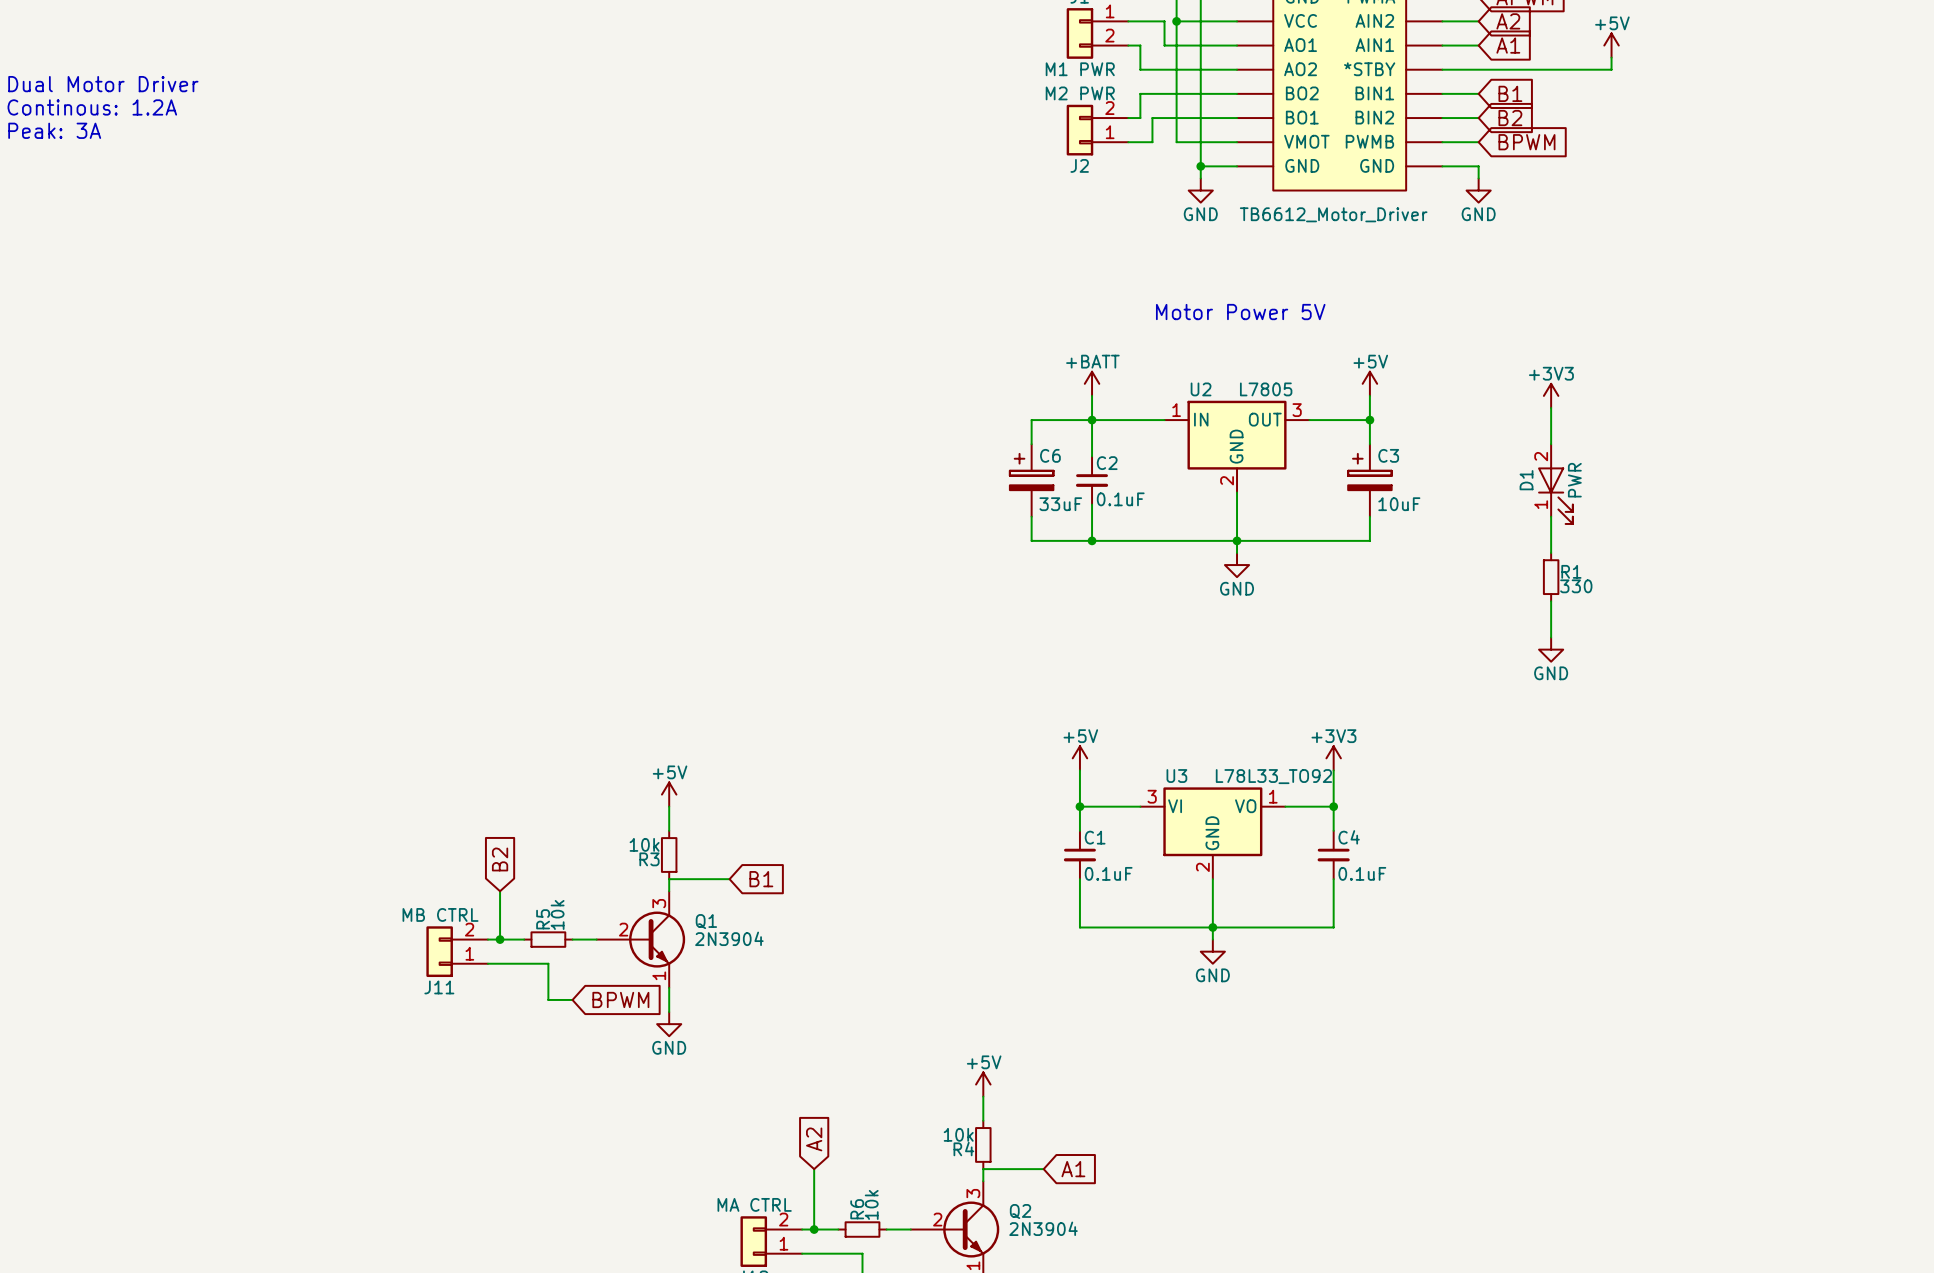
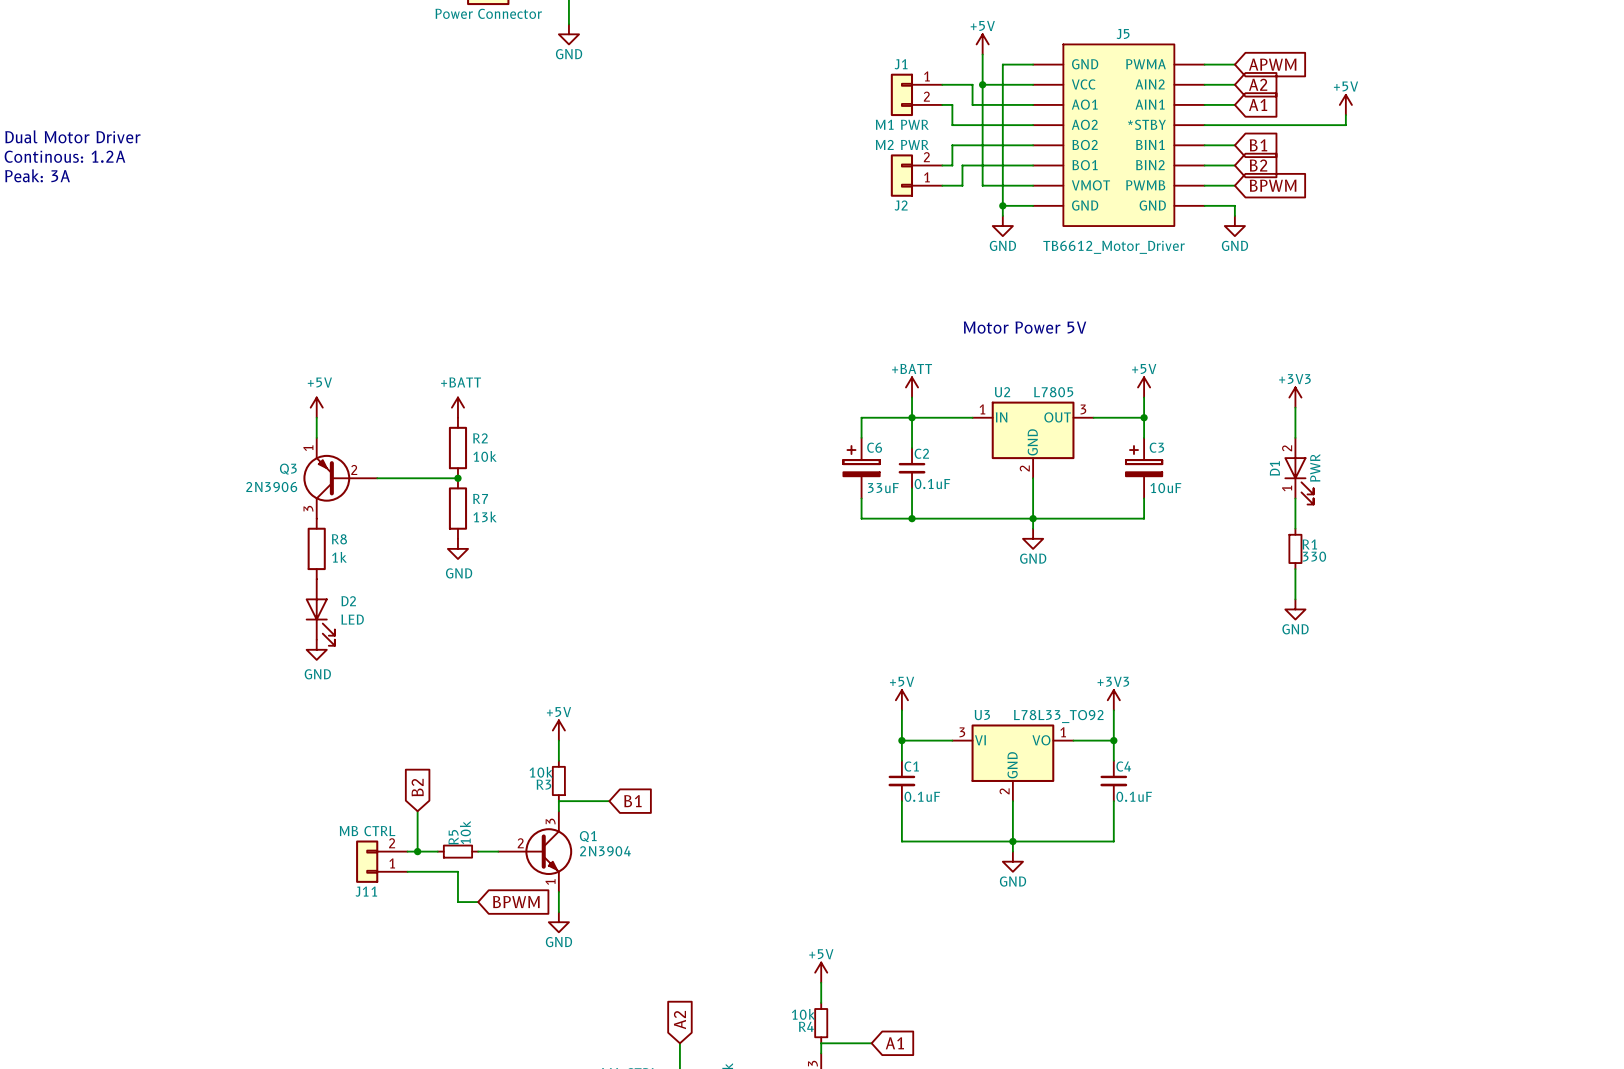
power symbol: none -> +5V (316, 407)
power symbol: none -> +BATT (457, 407)
wire: none -> (316, 417) (316, 437)
R2: none -> 10k (457, 448)
Q3: none -> 2N3906 (340, 478)
wire: none -> (377, 478) (457, 478)
junction: none -> (457, 478)
R7: none -> 13k (457, 508)
R8: none -> 1k (316, 548)
power symbol: none -> GND (457, 548)
D2: none -> LED (320, 612)
power symbol: none -> GND (316, 649)

